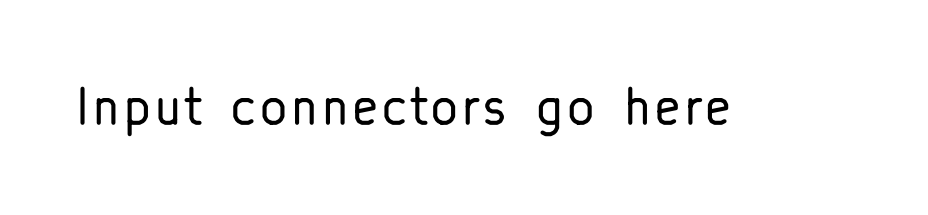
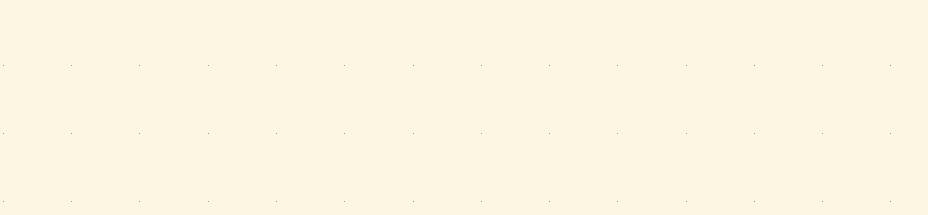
text: Input connectors go here (404, 111) -> none

